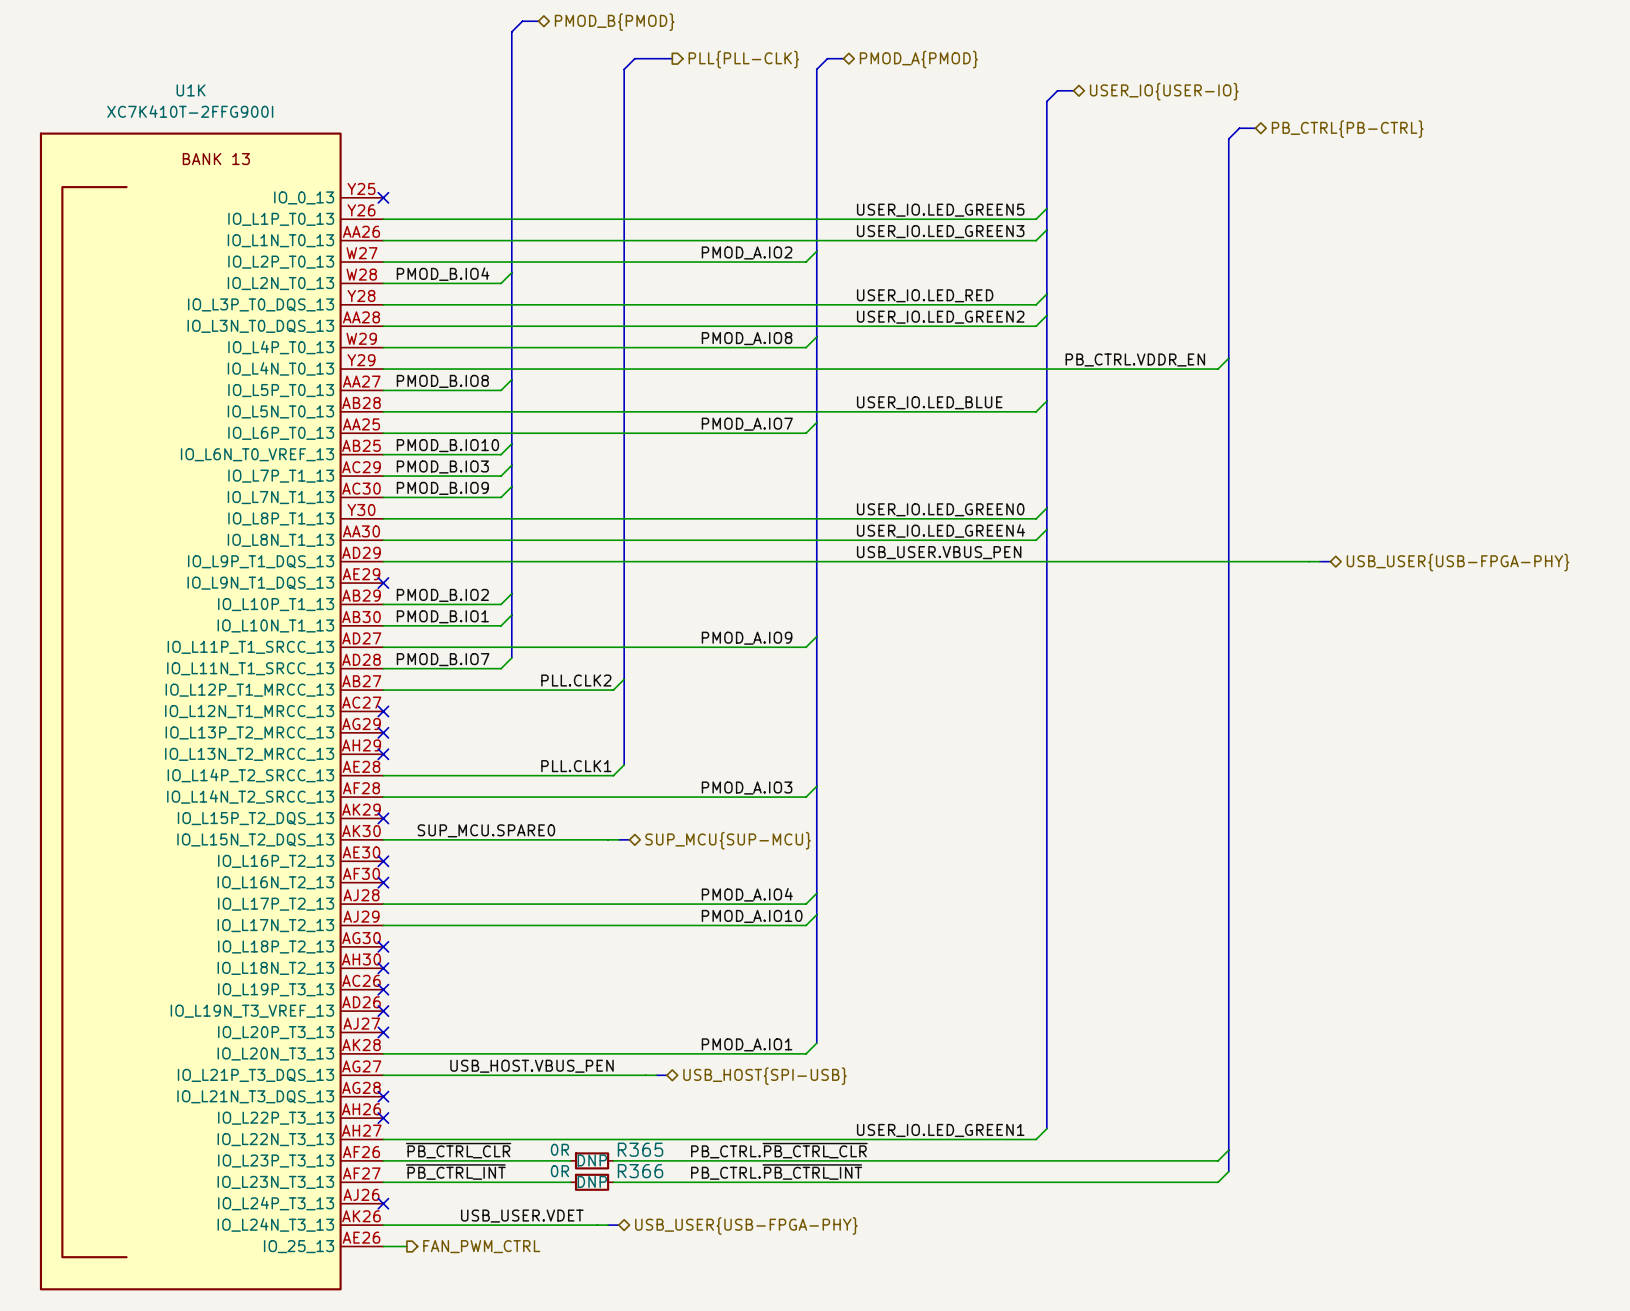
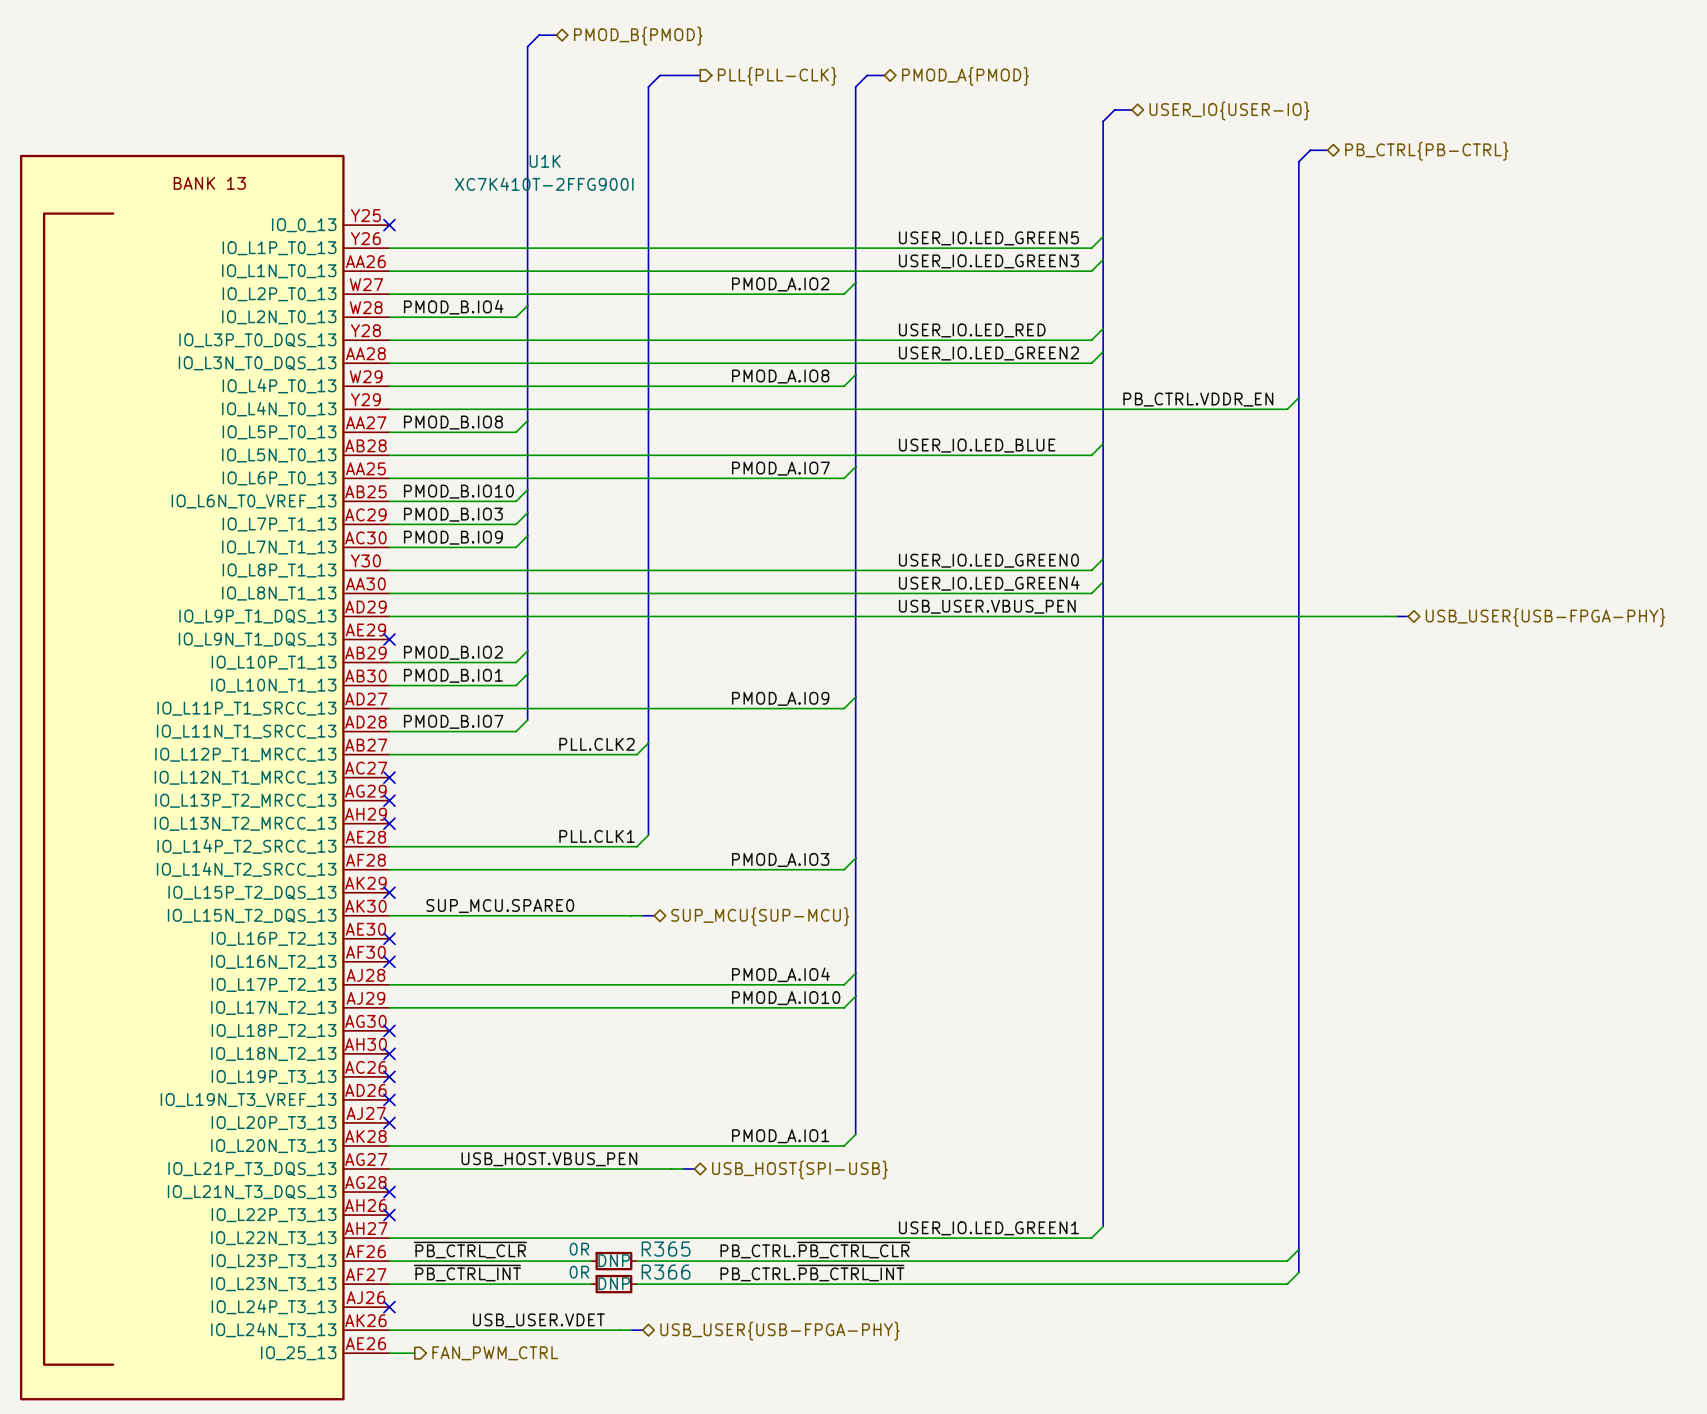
U1K name position: U1K (191, 90) -> U1K (545, 161)
U1K value position: XC7K410T-2FFG900I (190, 111) -> XC7K410T-2FFG900I (544, 184)

